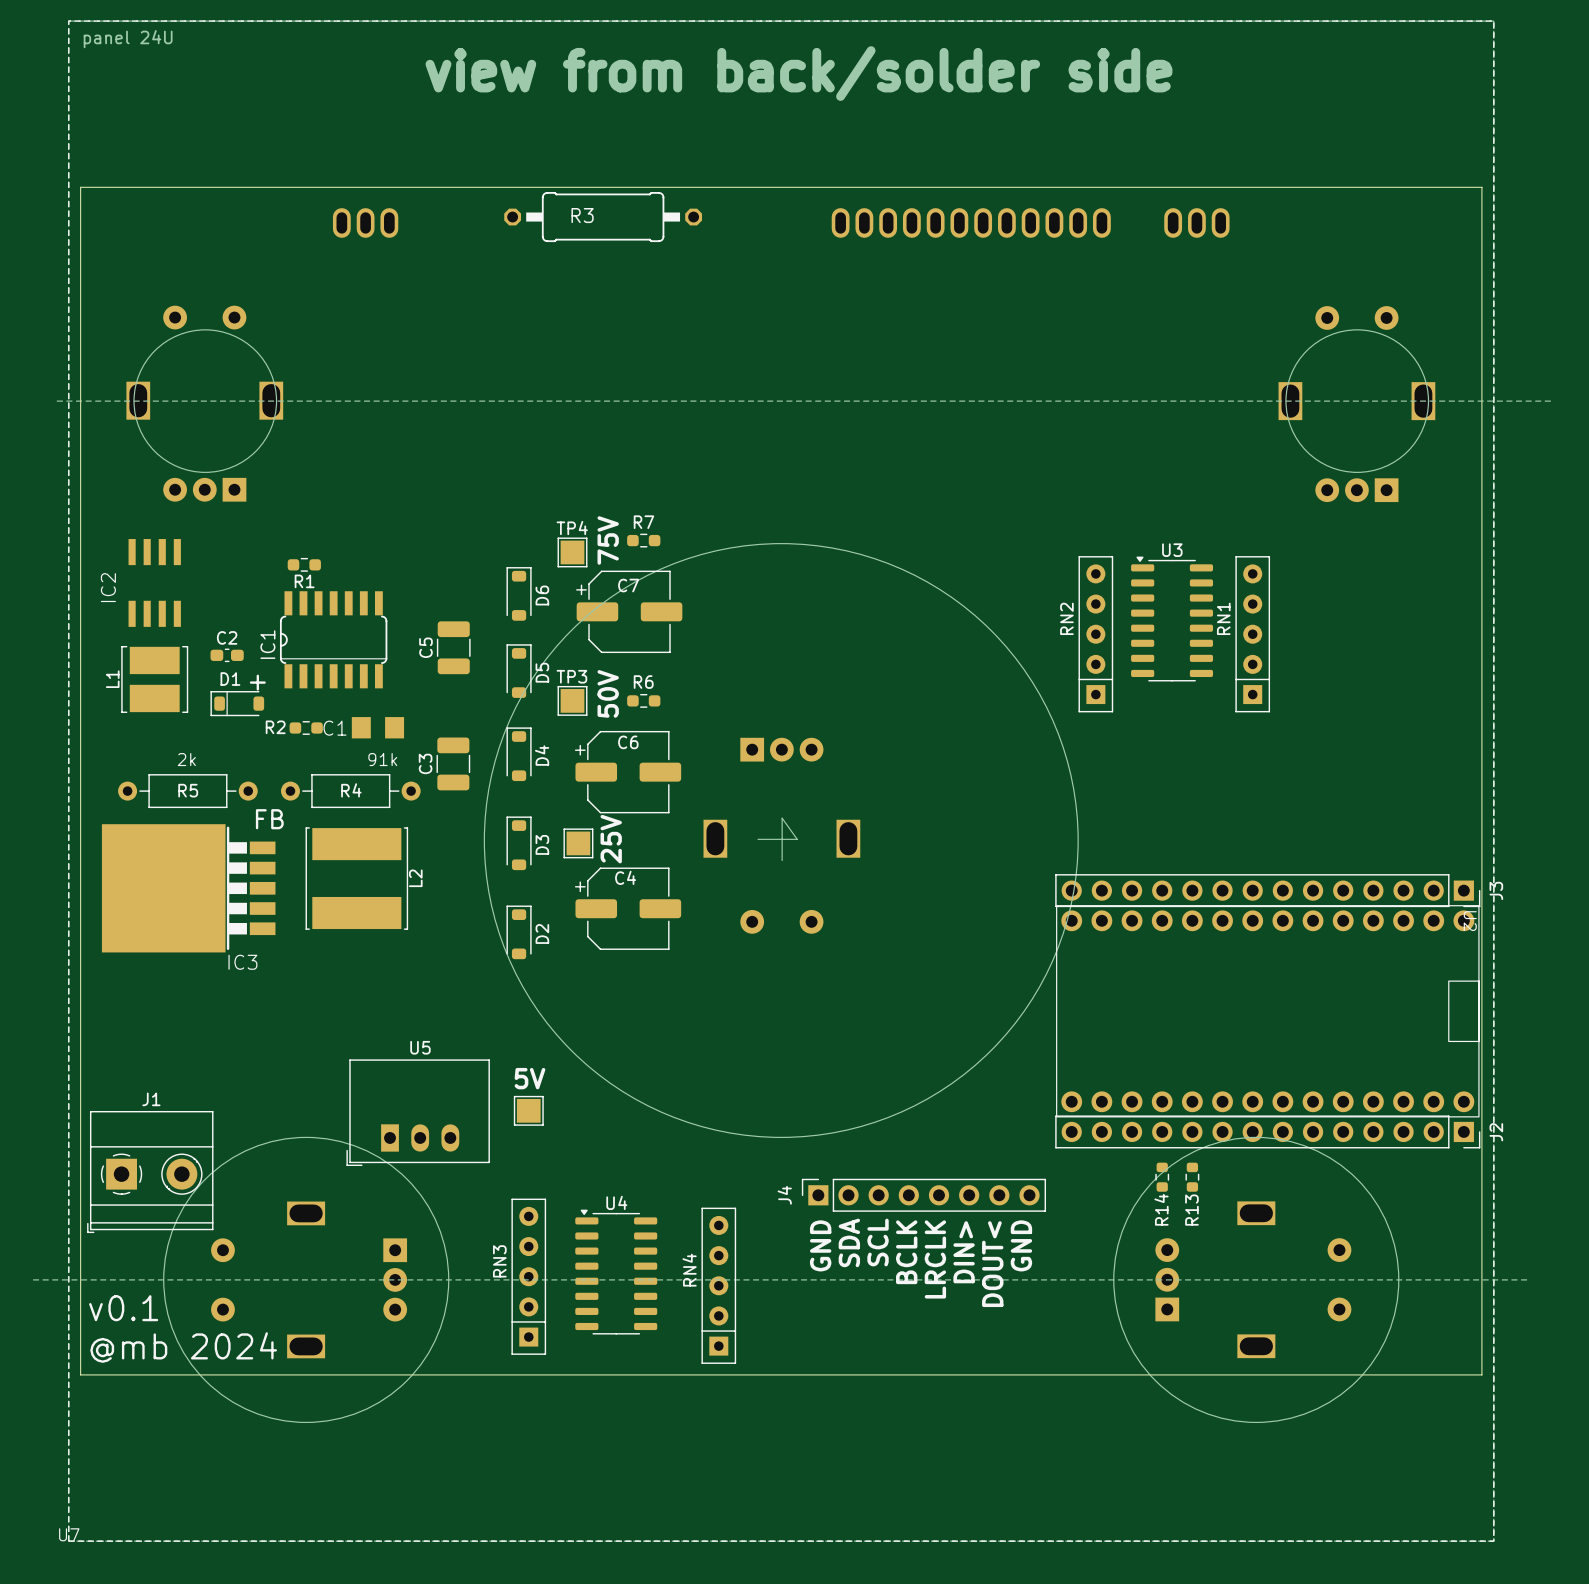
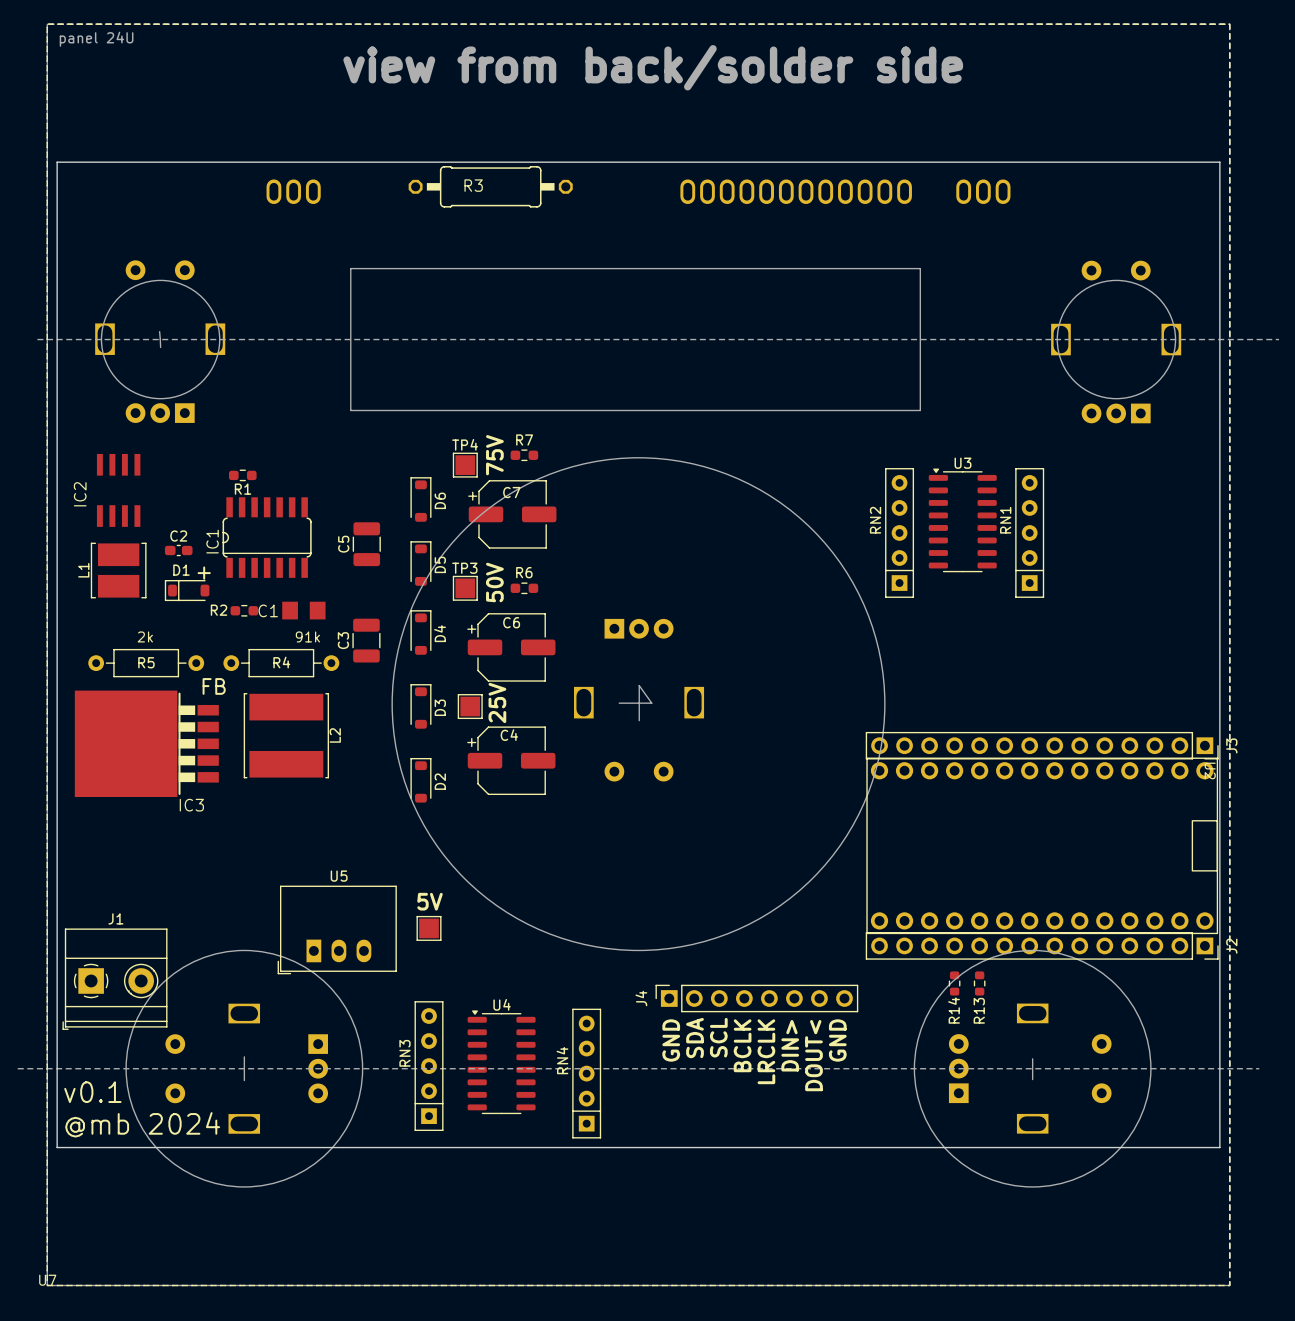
line: none -> (350, 268) (920, 268) (920, 410) (350, 410) (350, 268)
line: none -> (159, 331) (160, 347)
line: none -> (244, 1056) (244, 1080)
line: none -> (1032, 1058) (1032, 1079)

